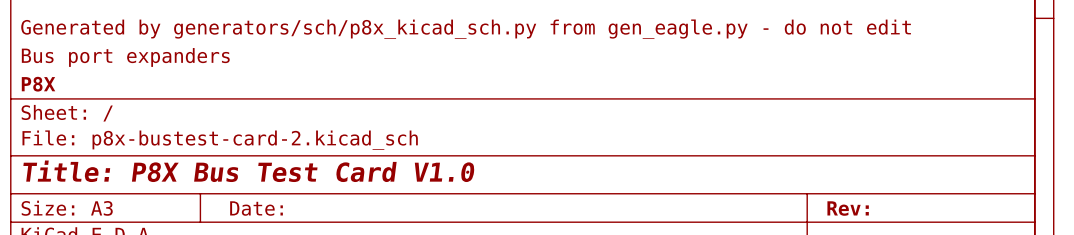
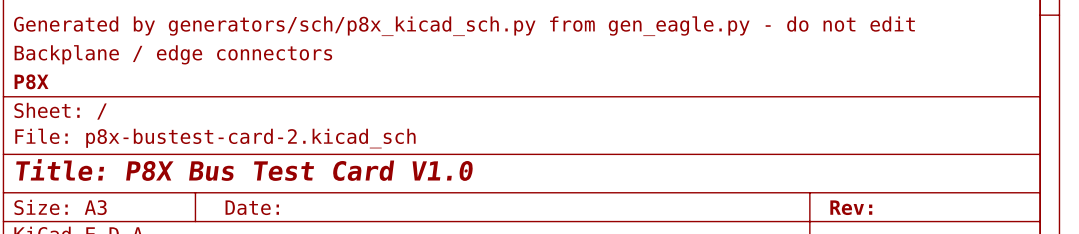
title block: Bus port expanders (125, 57) -> Backplane / edge connectors (173, 54)

